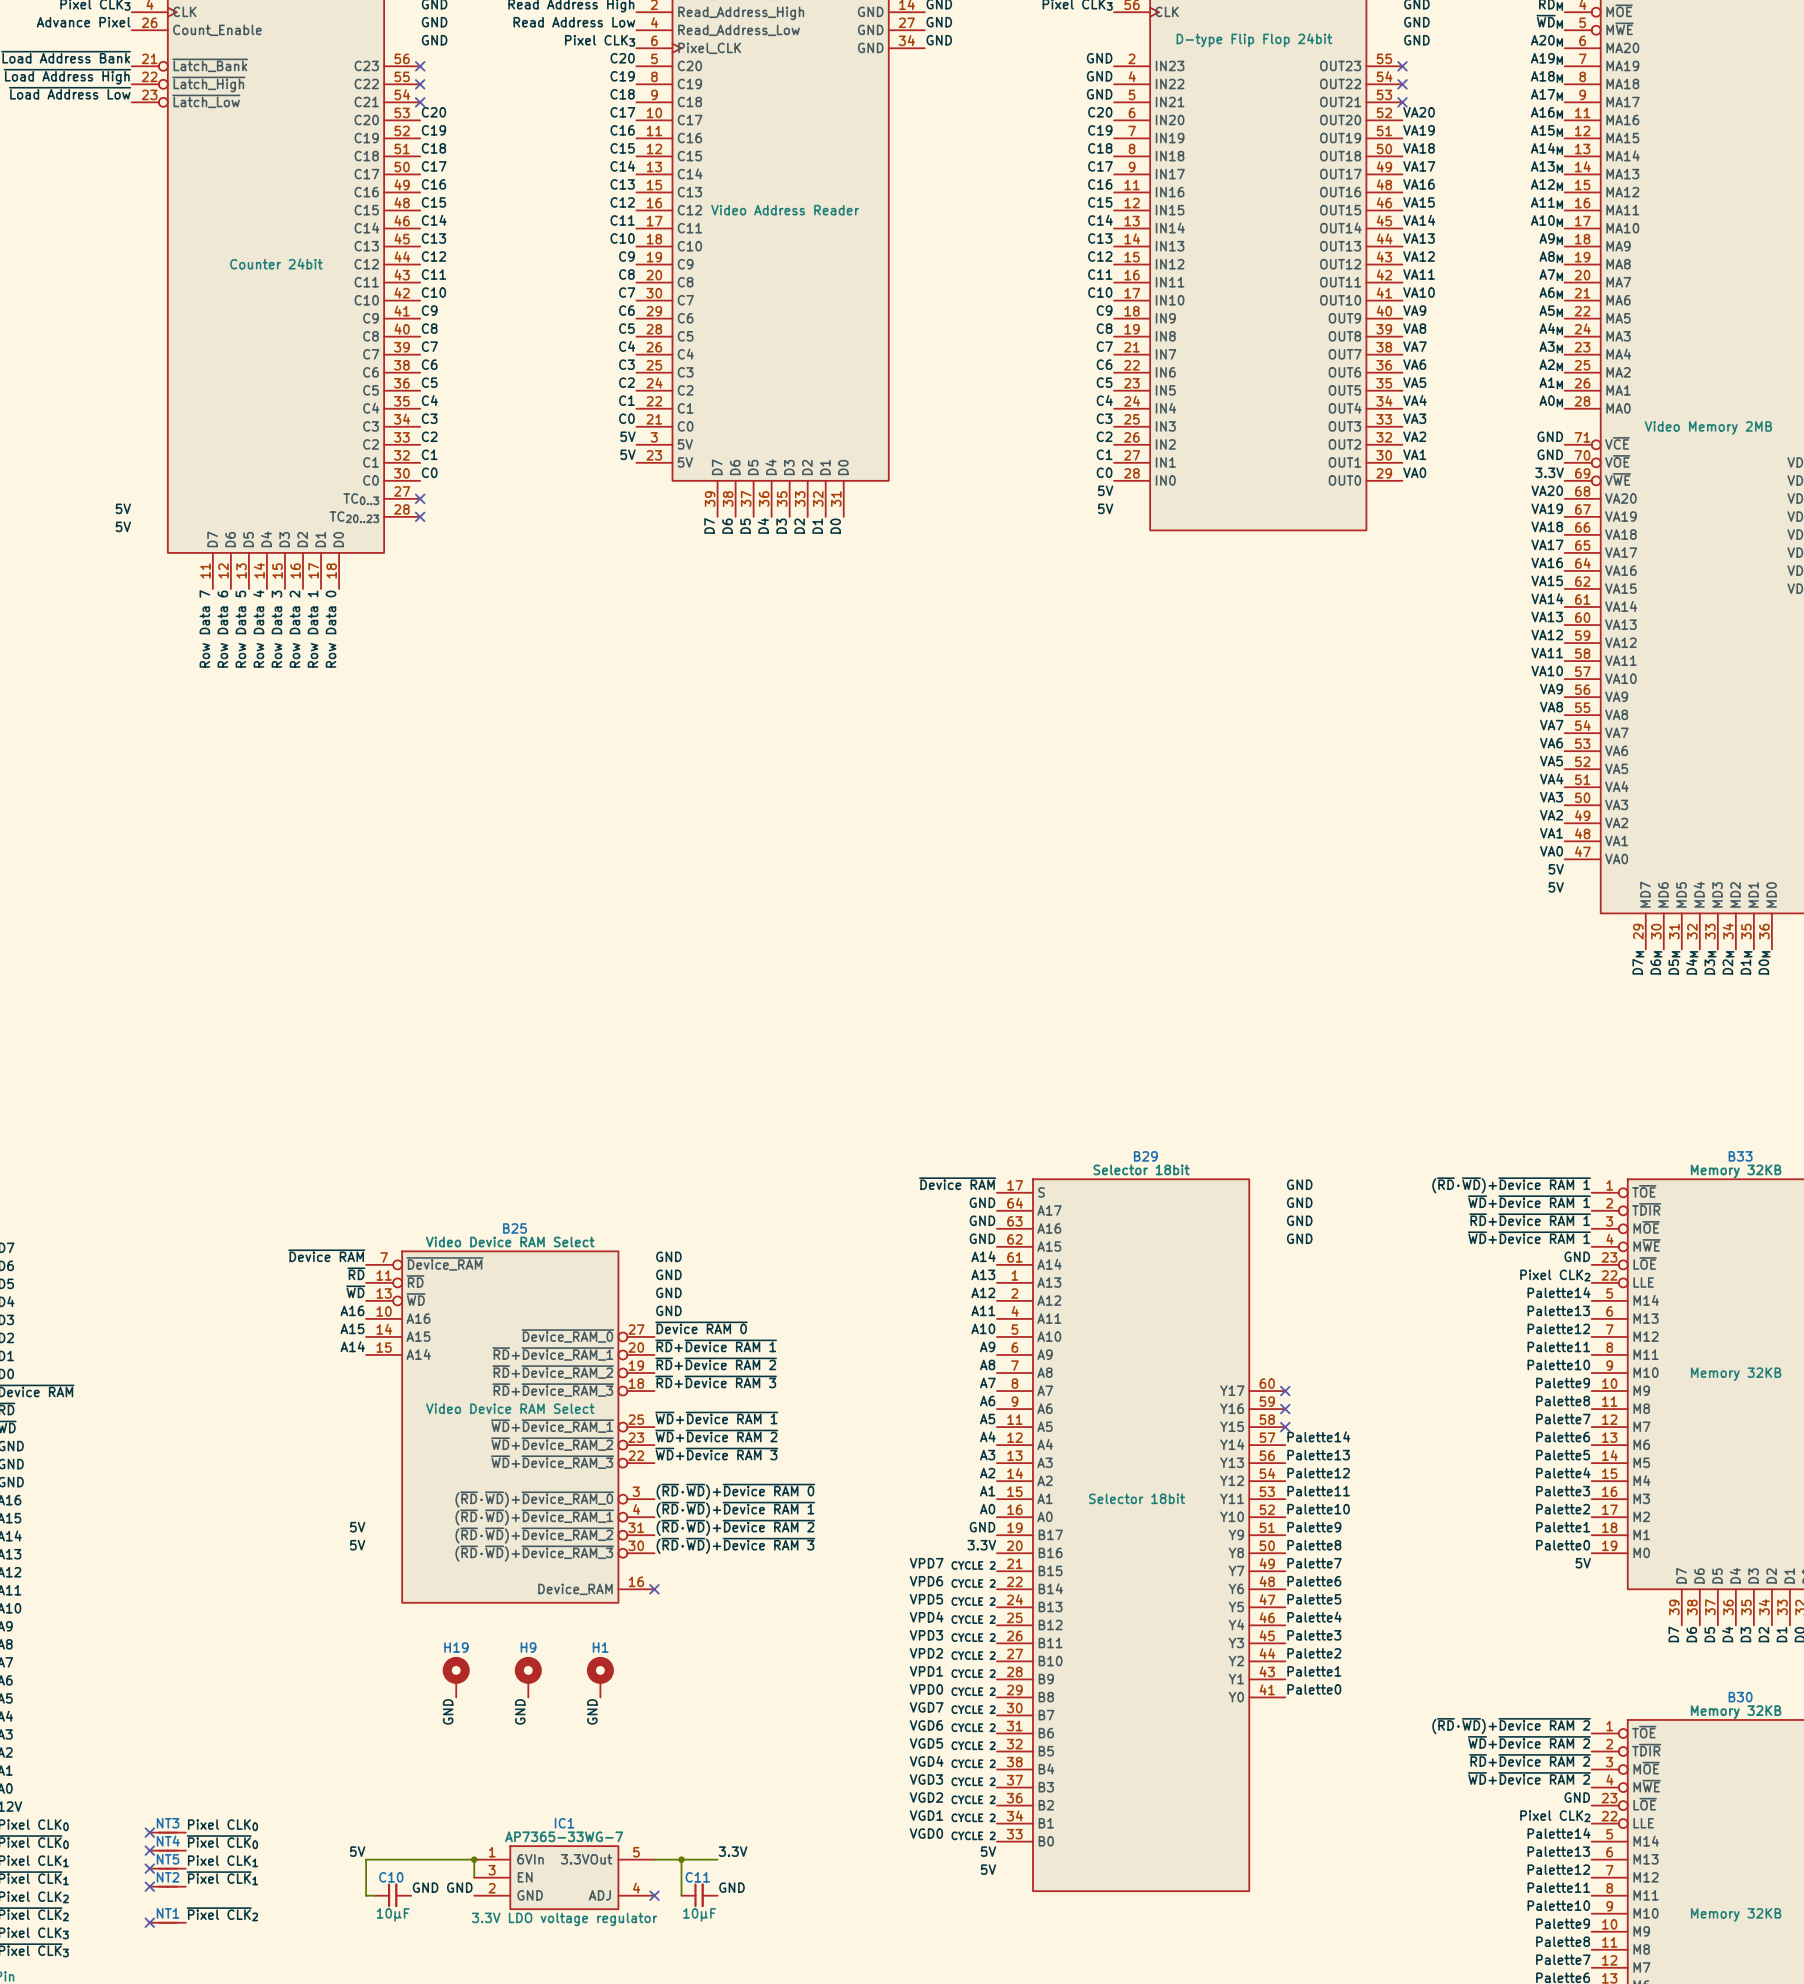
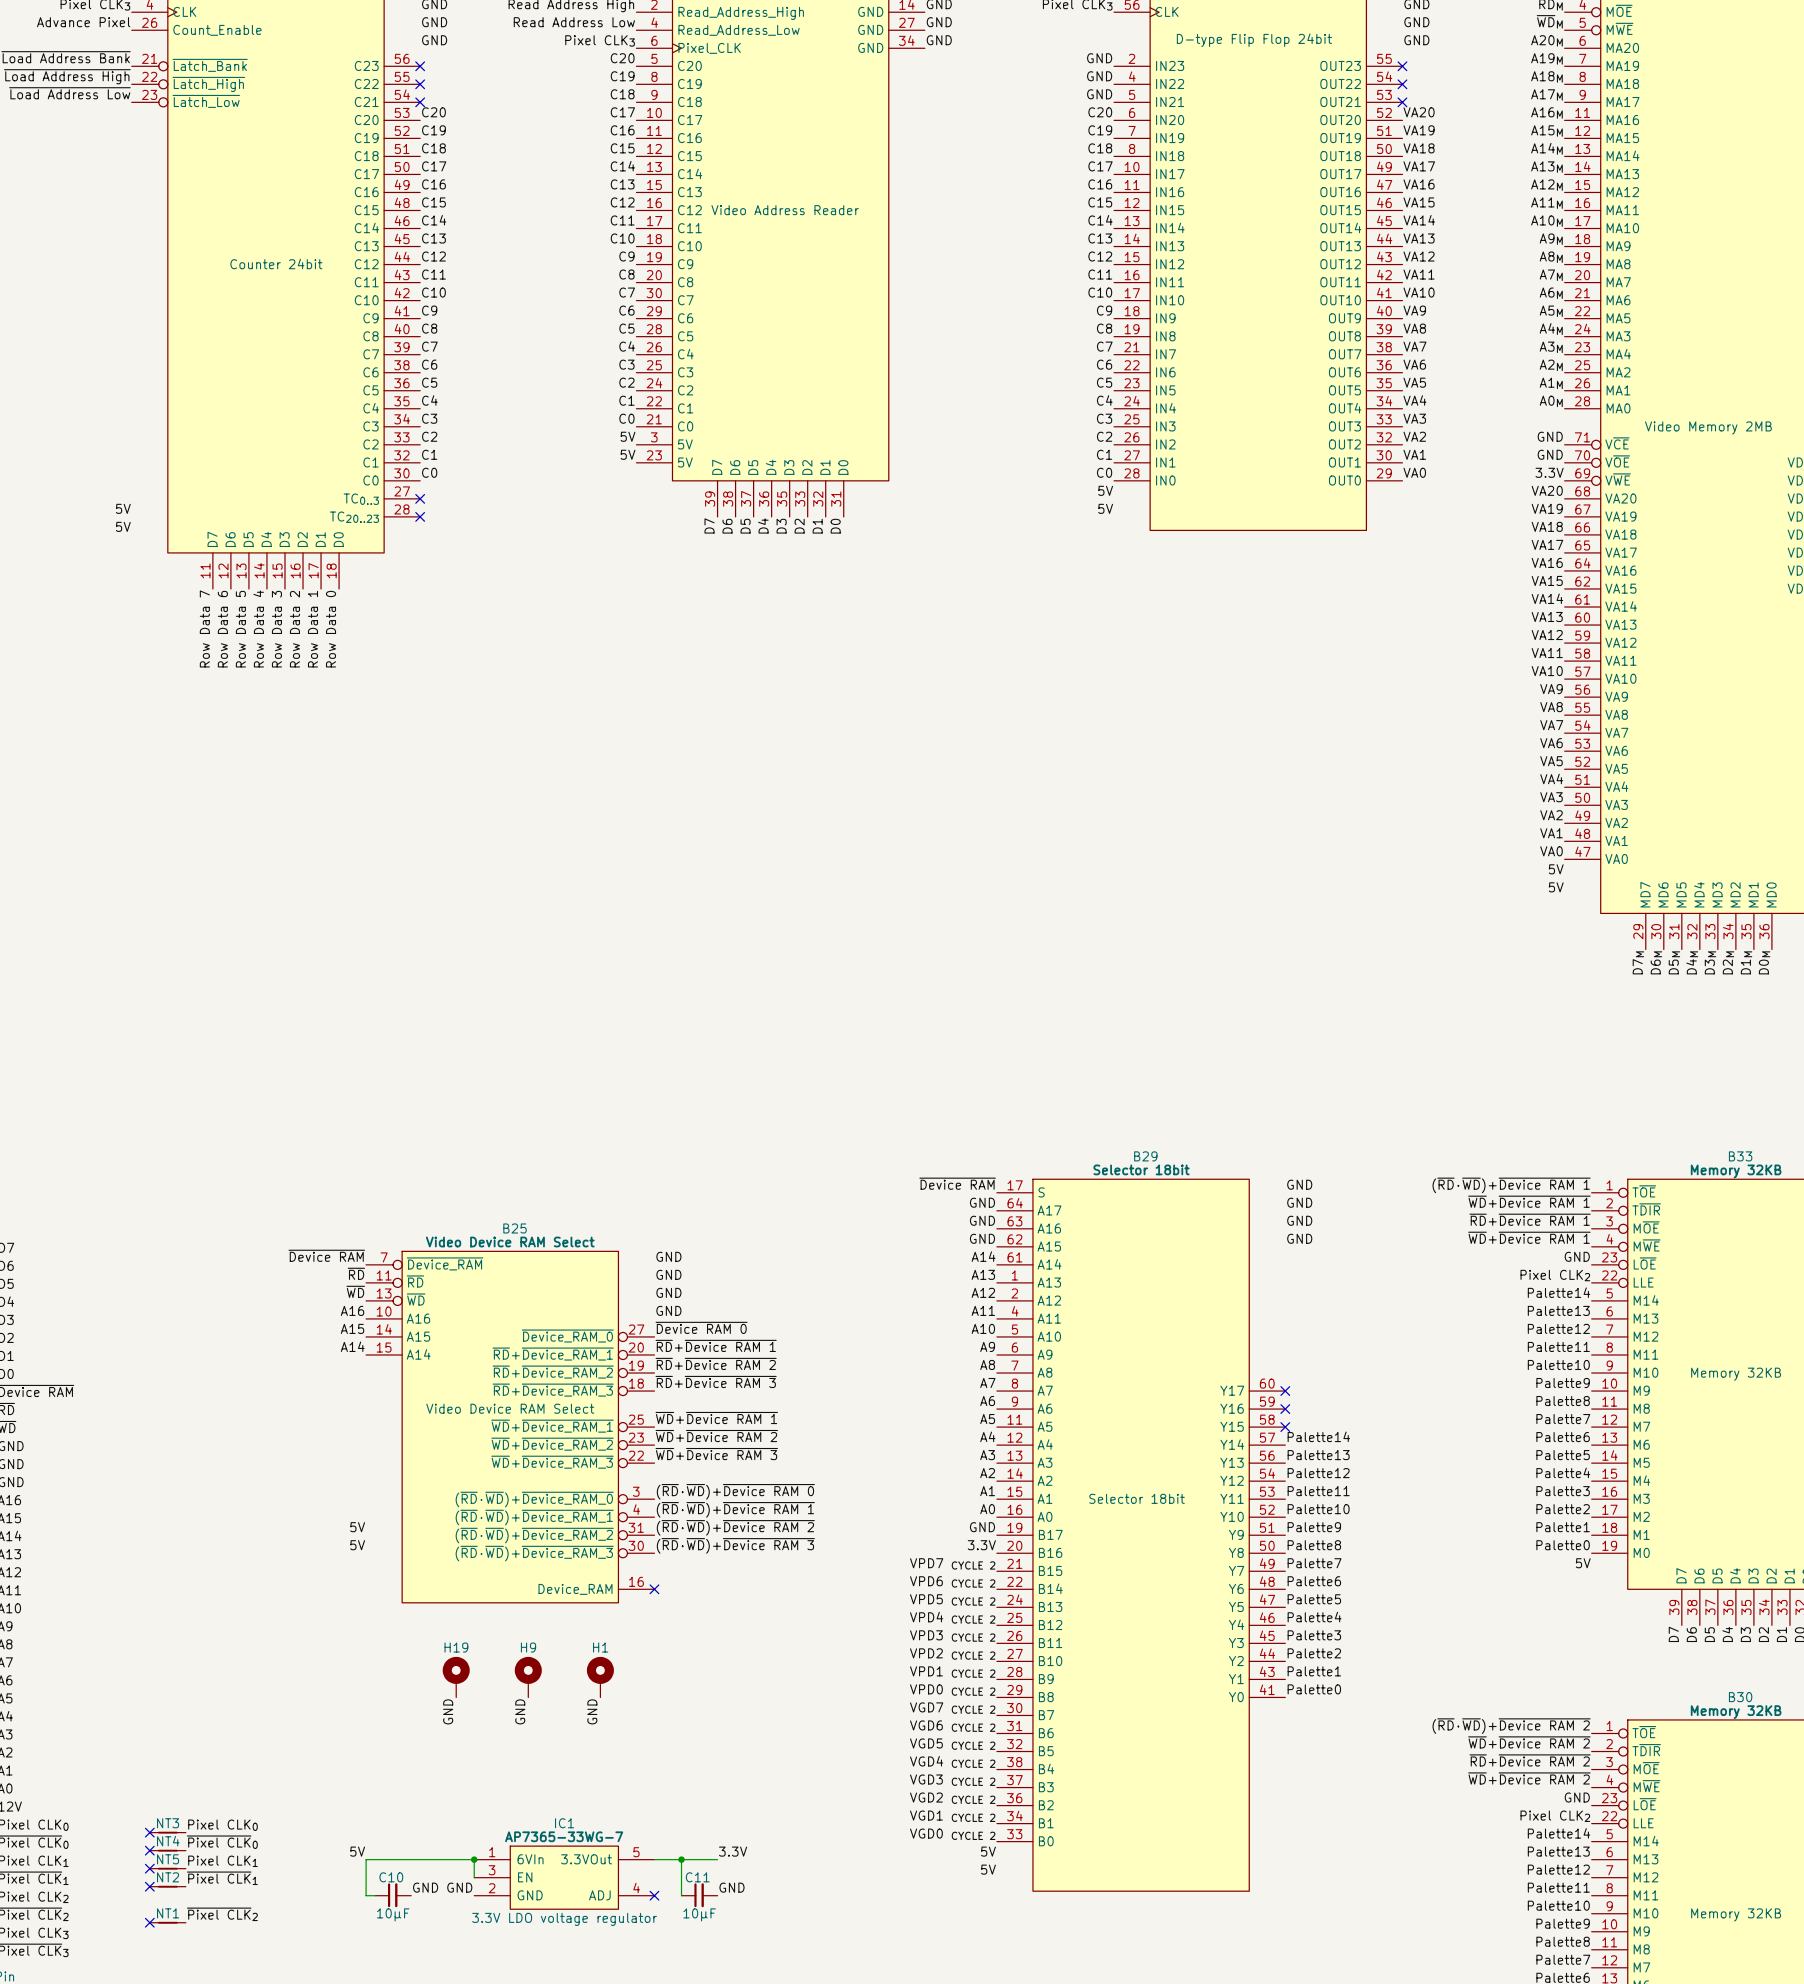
part pin number: 9 (1132, 167) -> 10 (1132, 167)
part pin number: 48 (1384, 184) -> 47 (1384, 184)

